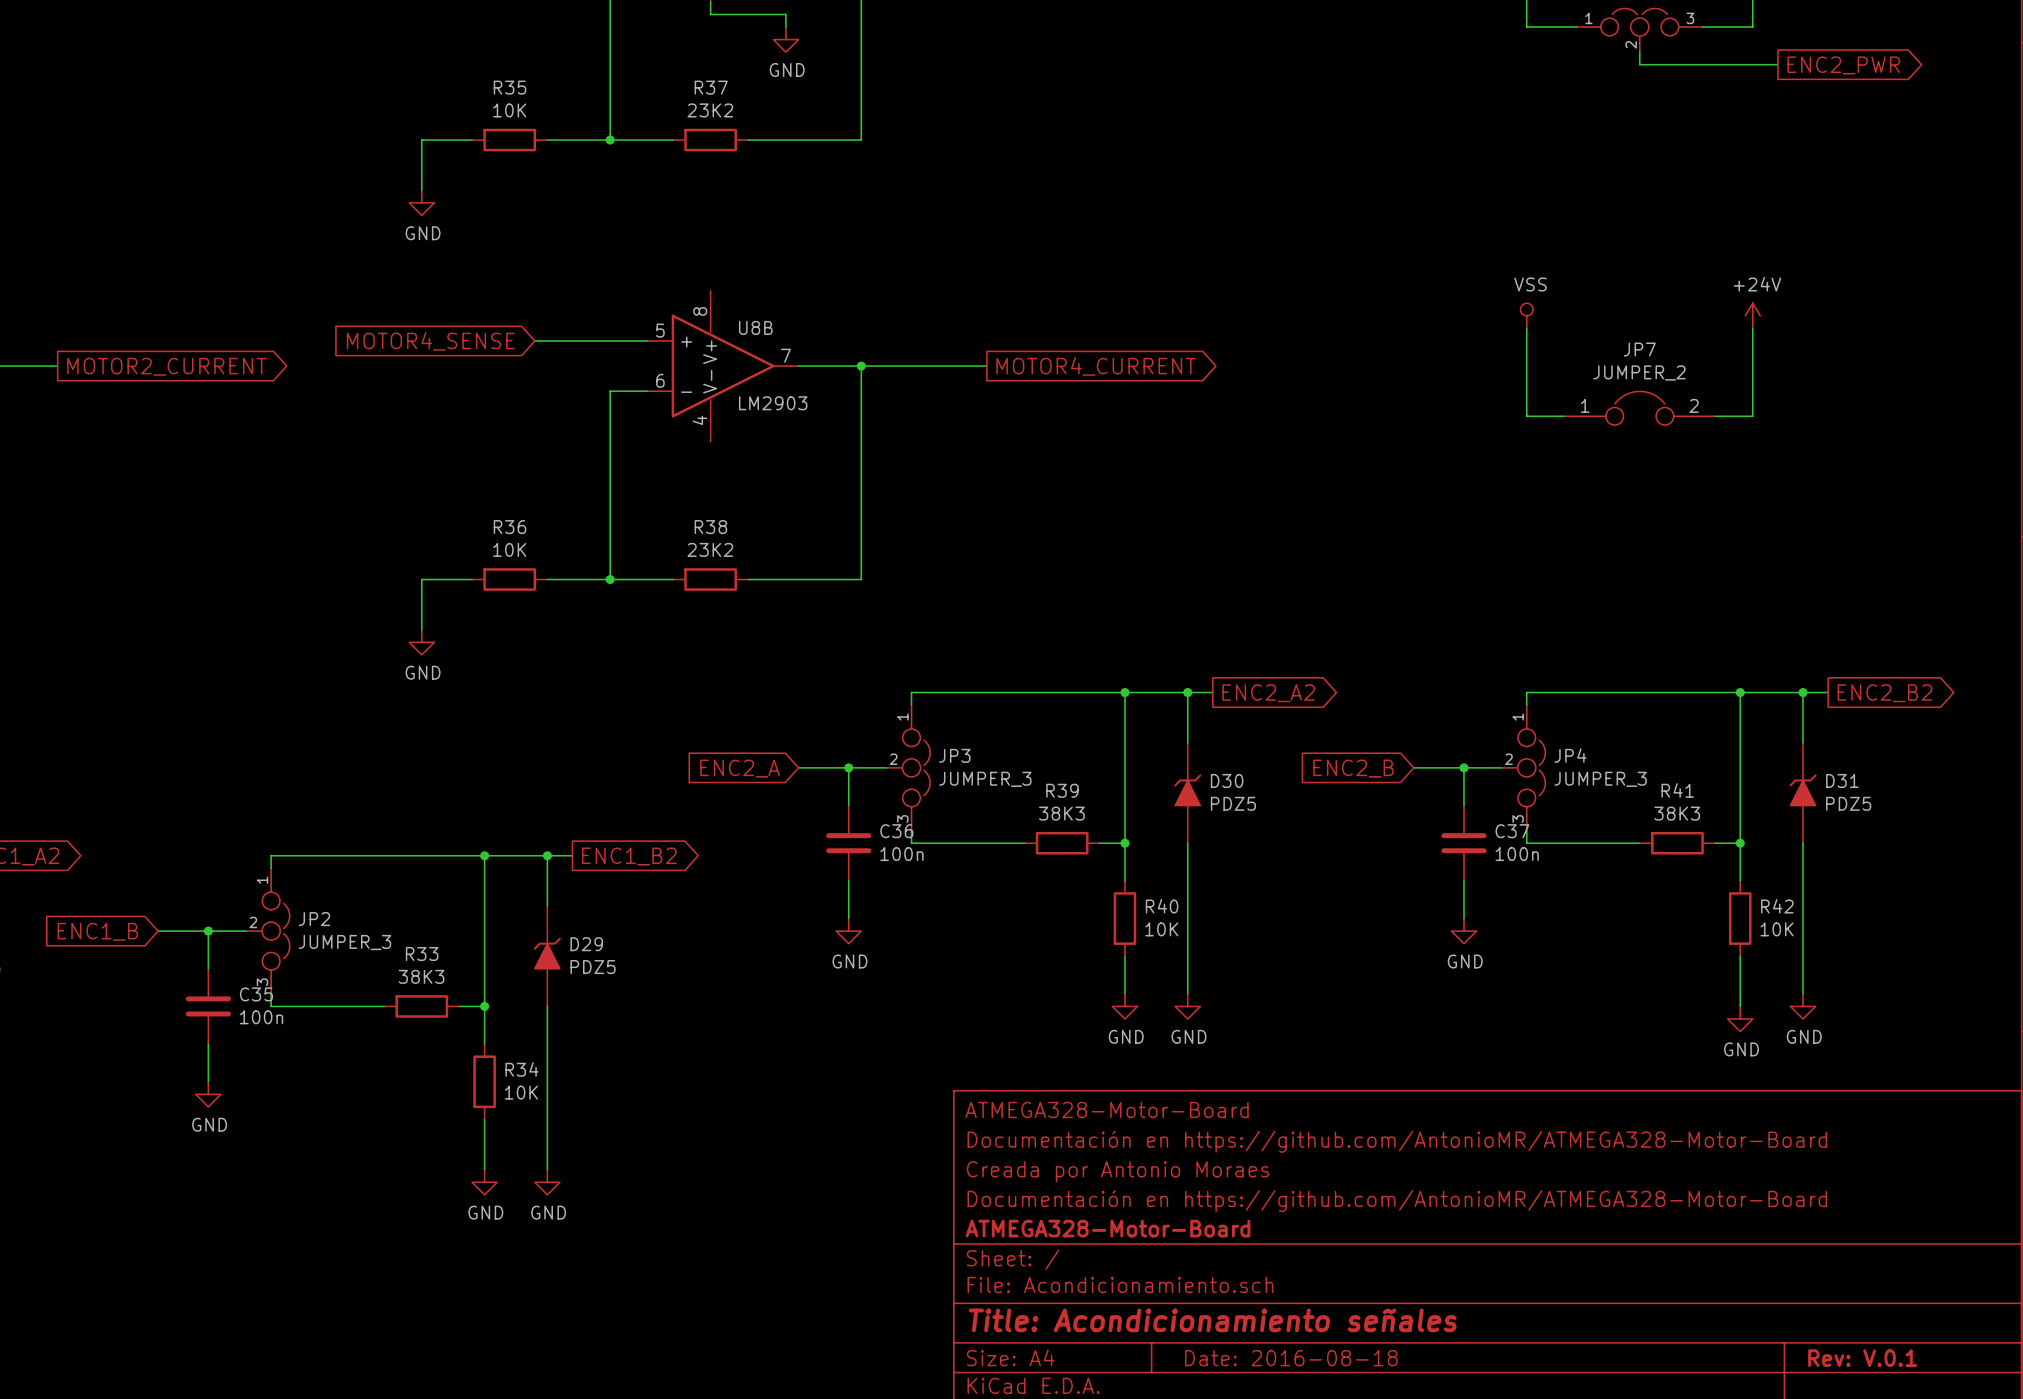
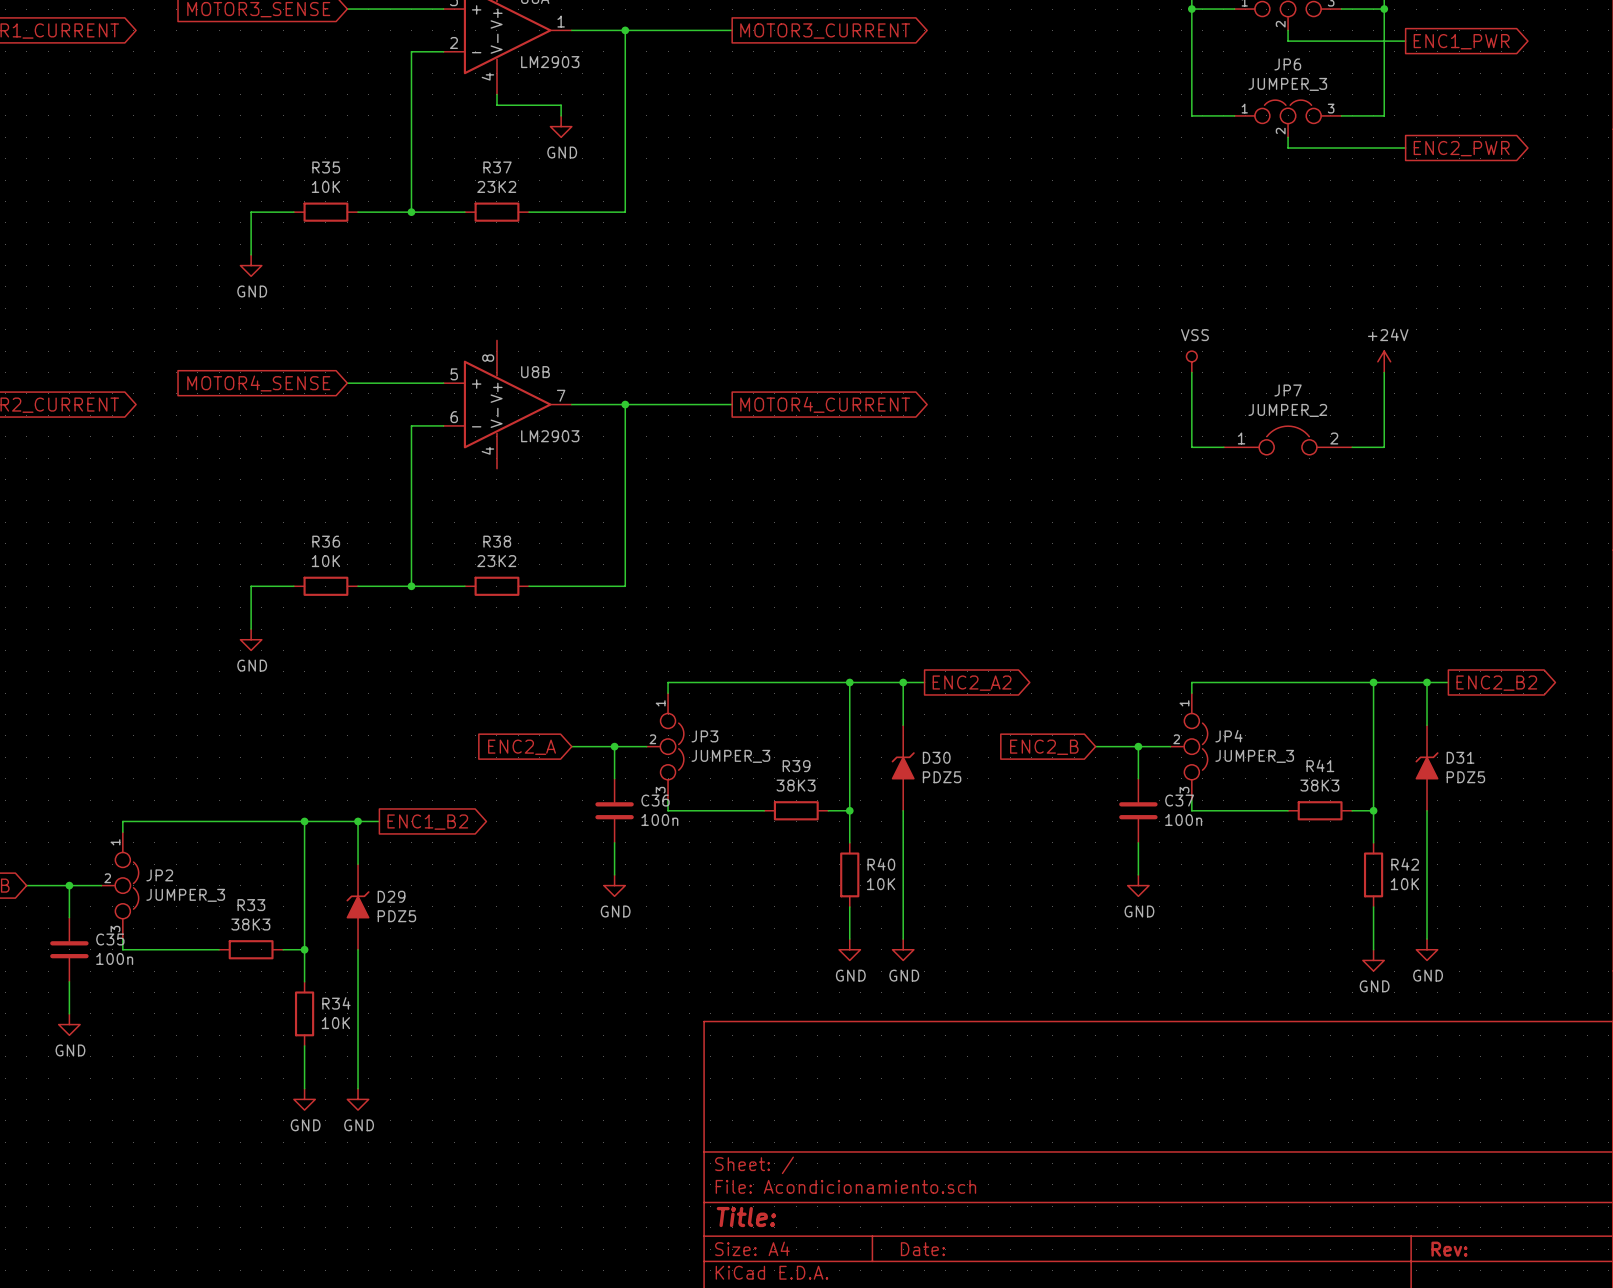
title block: ATMEGA328-Motor-Board (1107, 1109) -> none
title block: Documentación en https://github.com/AntonioMR/ATMEGA328-Motor-Board (1397, 1141) -> none
title block: Creada por Antonio Moraes (1117, 1171) -> none
title block: Documentación en https://github.com/AntonioMR/ATMEGA328-Motor-Board (1397, 1201) -> none
title block: ATMEGA328-Motor-Board (1107, 1228) -> none
title block: Title: Acondicionamiento señales (1212, 1320) -> Title: (746, 1217)
title block: Date: 2016-08-18 (1291, 1358) -> Date: (922, 1249)
title block: Rev: V.0.1 (1862, 1358) -> Rev: (1449, 1249)

